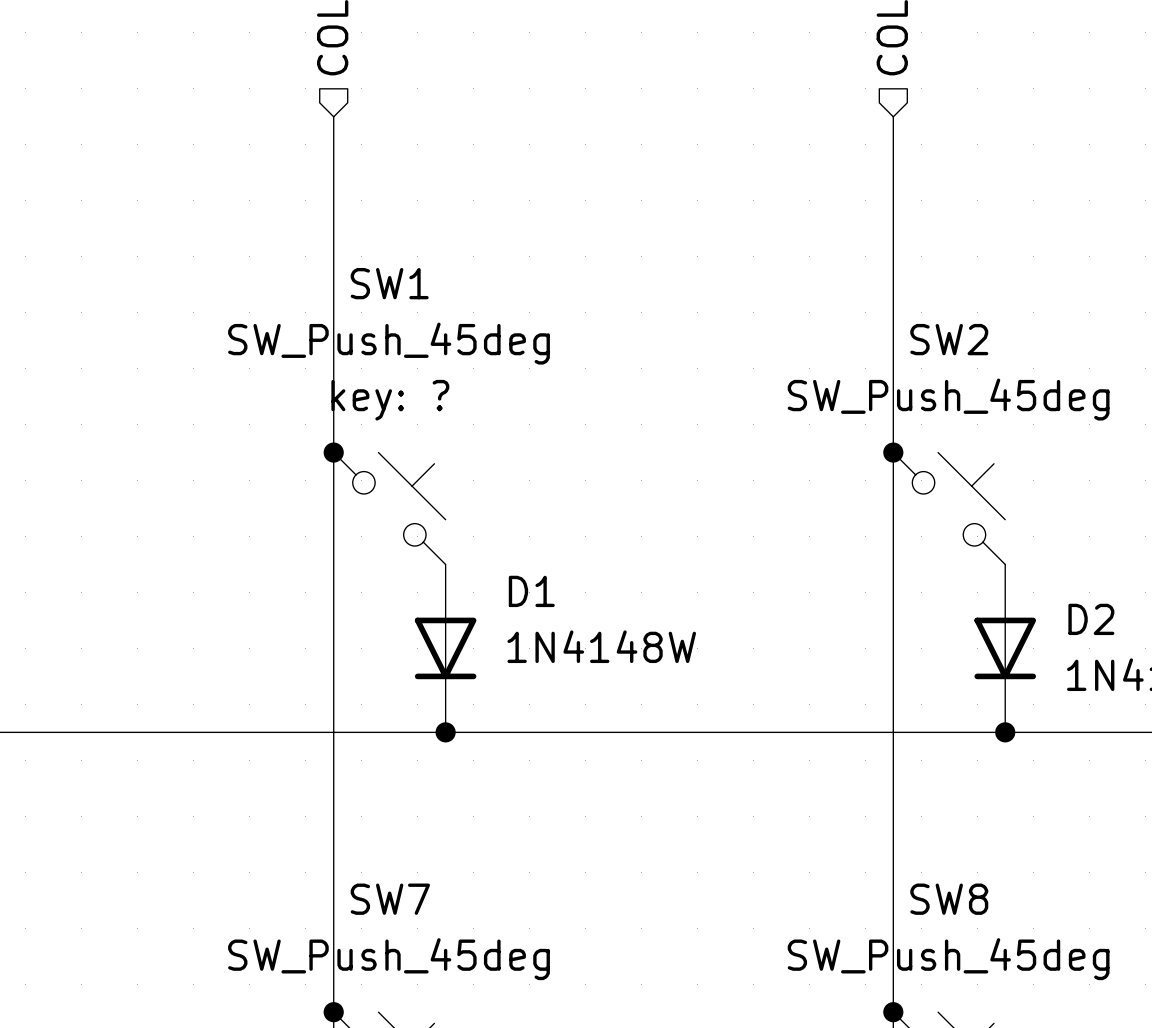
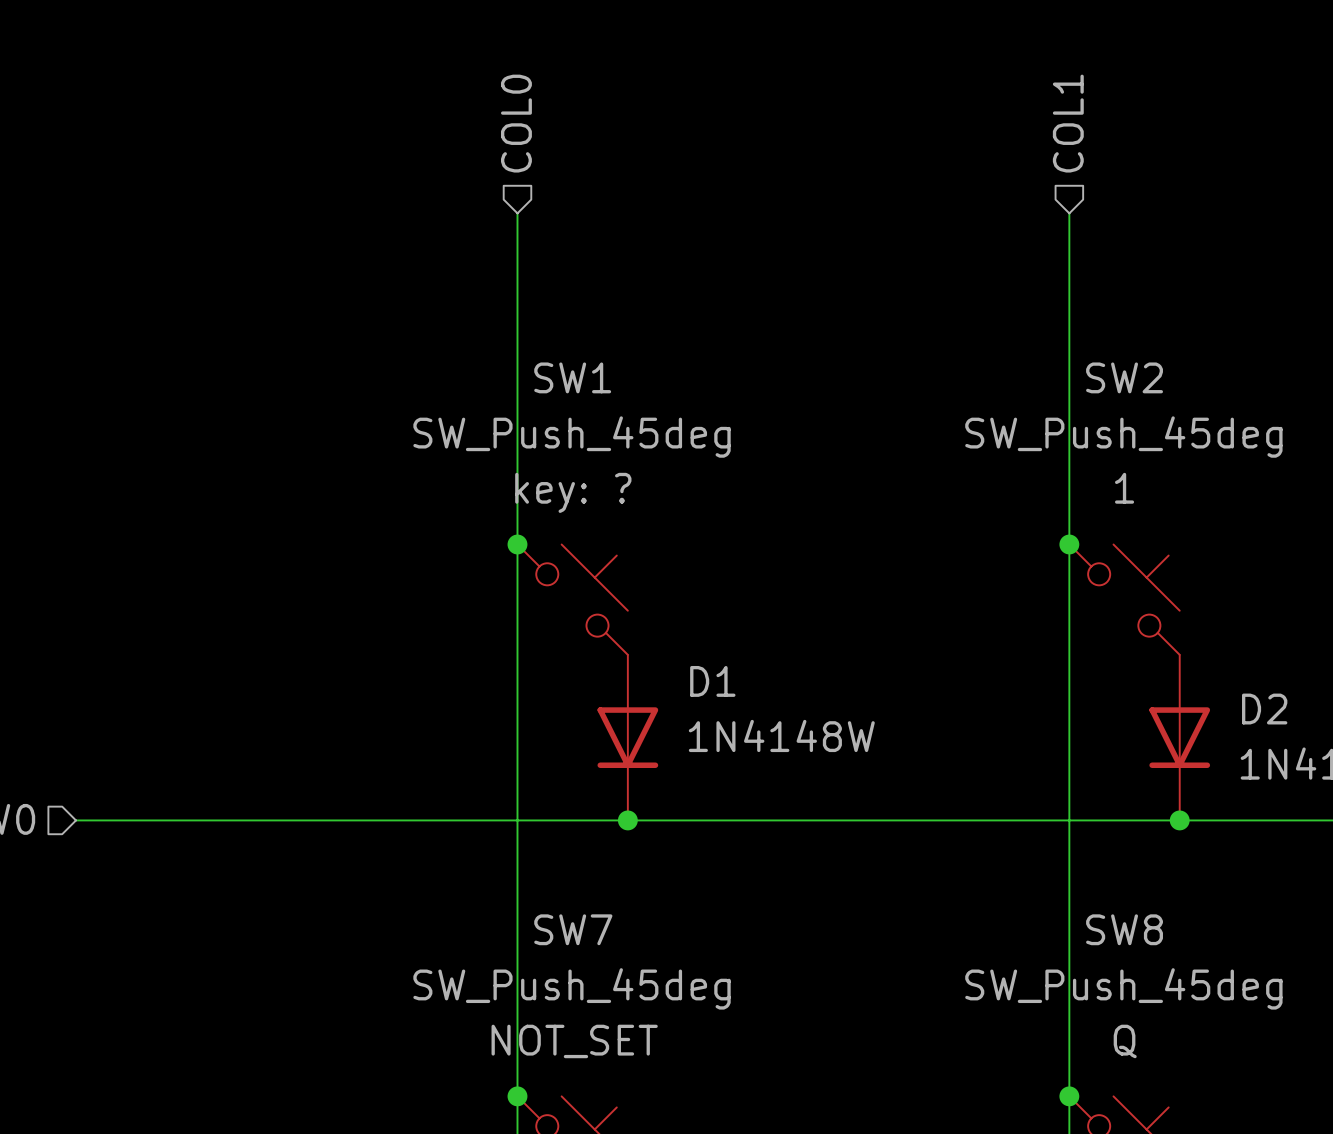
SW2 name position: SW2 (949, 339) -> SW2 (1124, 377)
SW2 text: none -> 1 (1124, 488)
SW2 value position: SW_Push_45deg (948, 399) -> SW_Push_45deg (1123, 437)
SW7 name position: SW7 (390, 899) -> SW7 (573, 929)
SW8 name position: SW8 (949, 899) -> SW8 (1124, 929)
SW7 text: none -> NOT_SET (574, 1041)
SW8 text: none -> Q (1125, 1041)
SW7 value position: SW_Push_45deg (389, 959) -> SW_Push_45deg (572, 988)
SW8 value position: SW_Push_45deg (948, 959) -> SW_Push_45deg (1123, 988)

